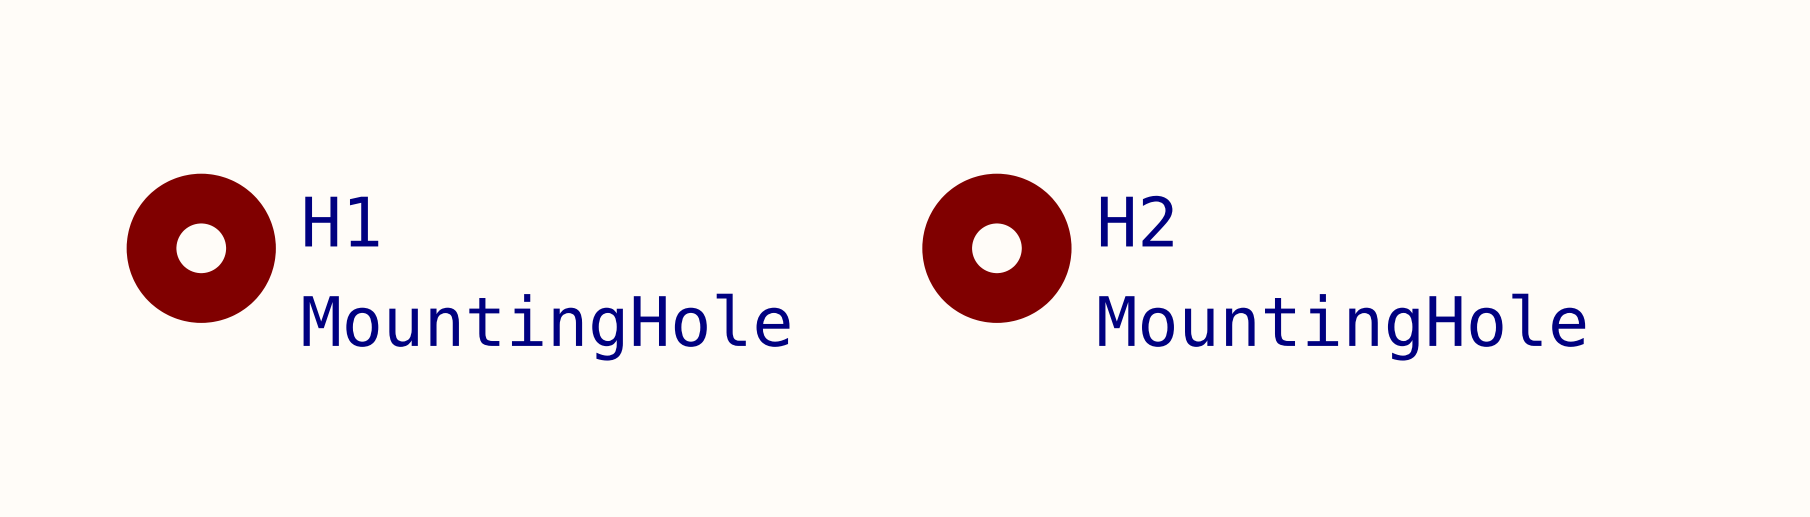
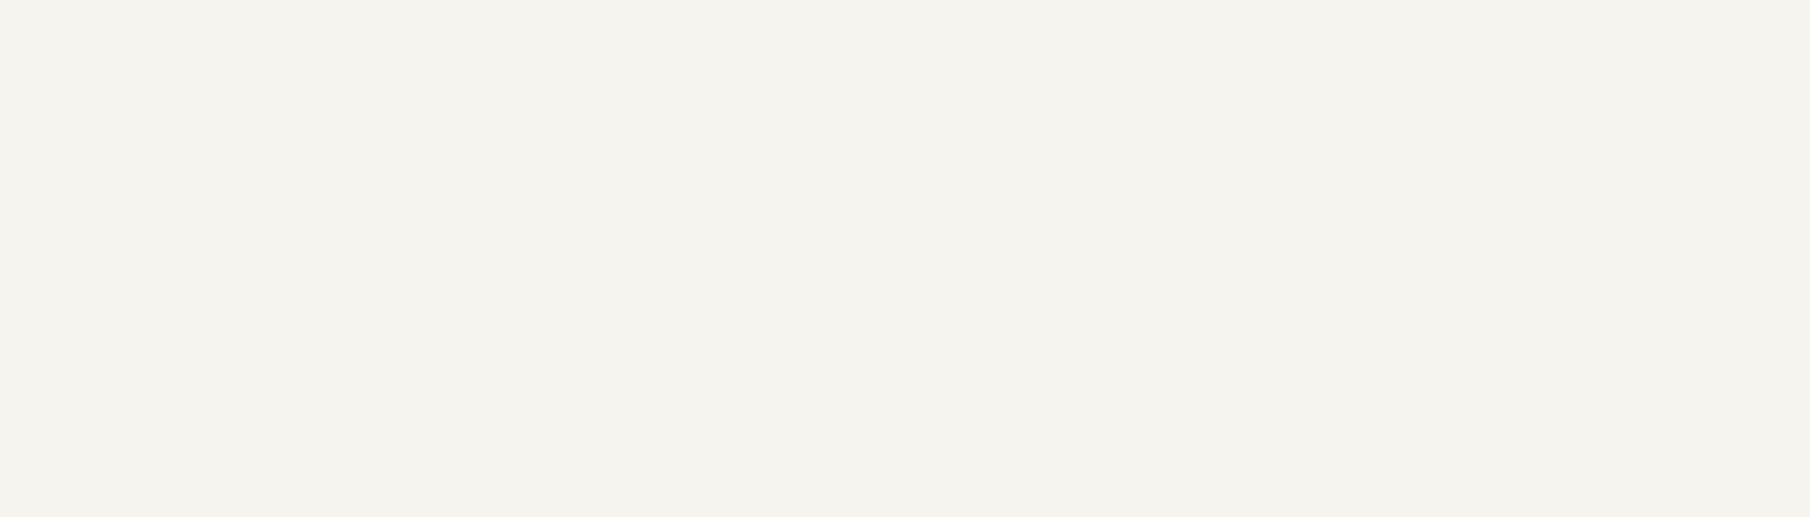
H1: MountingHole (201, 248) -> none
H2: MountingHole (996, 248) -> none

